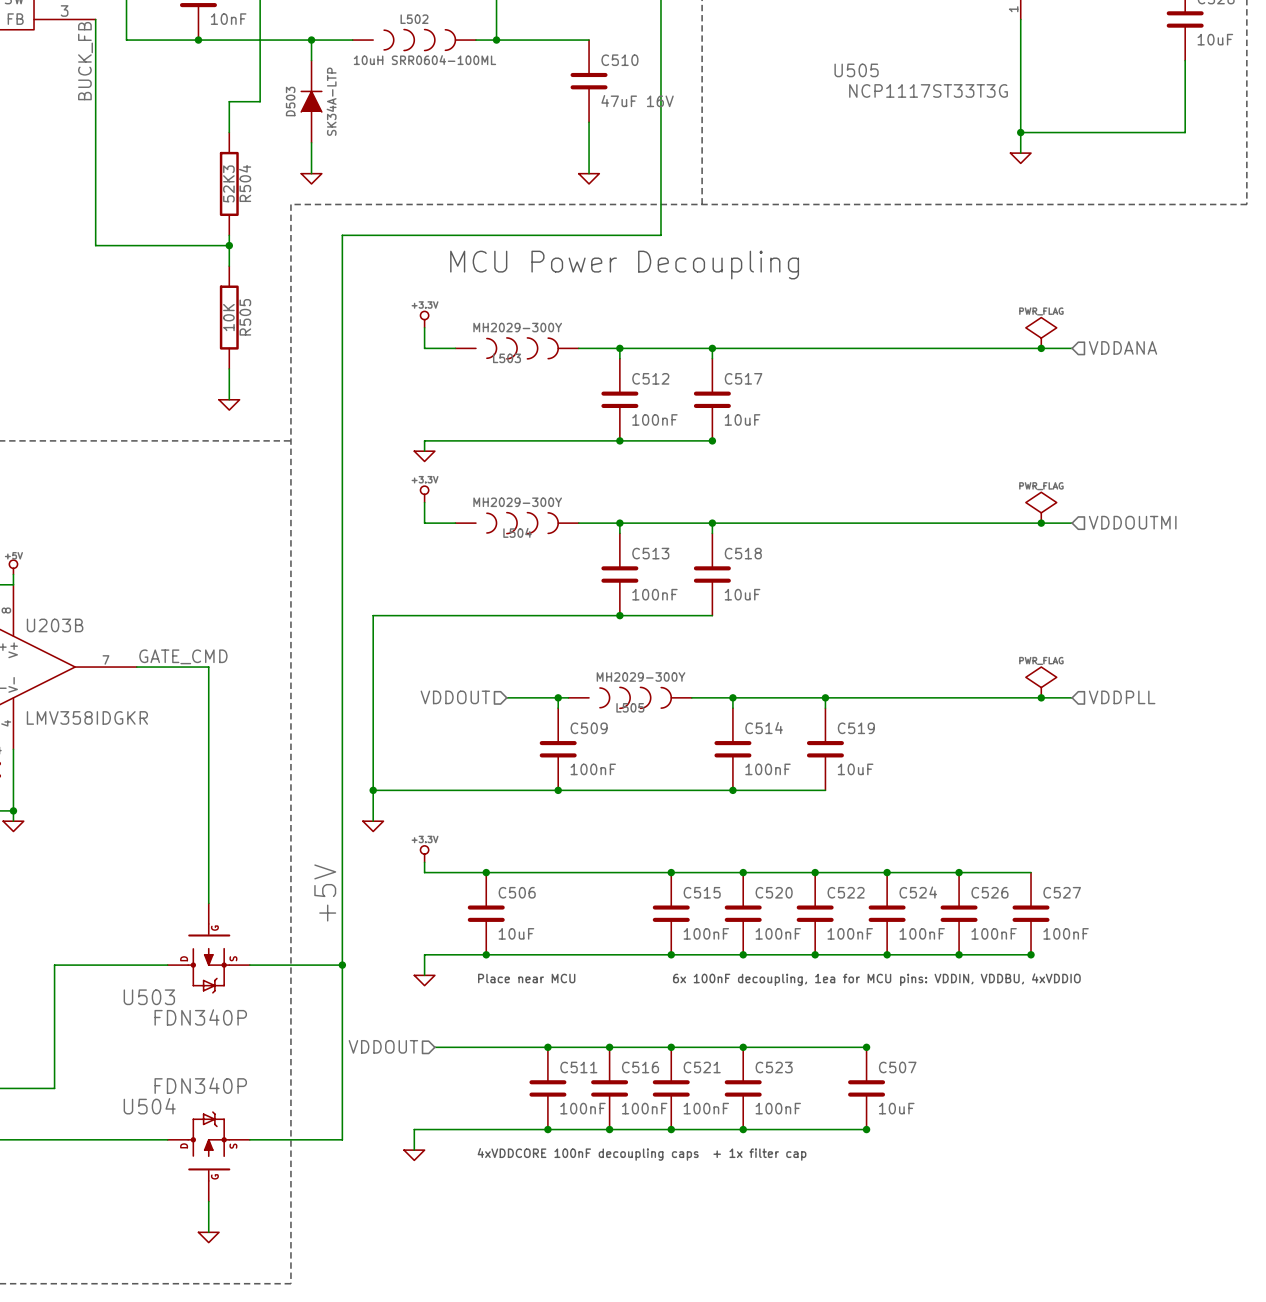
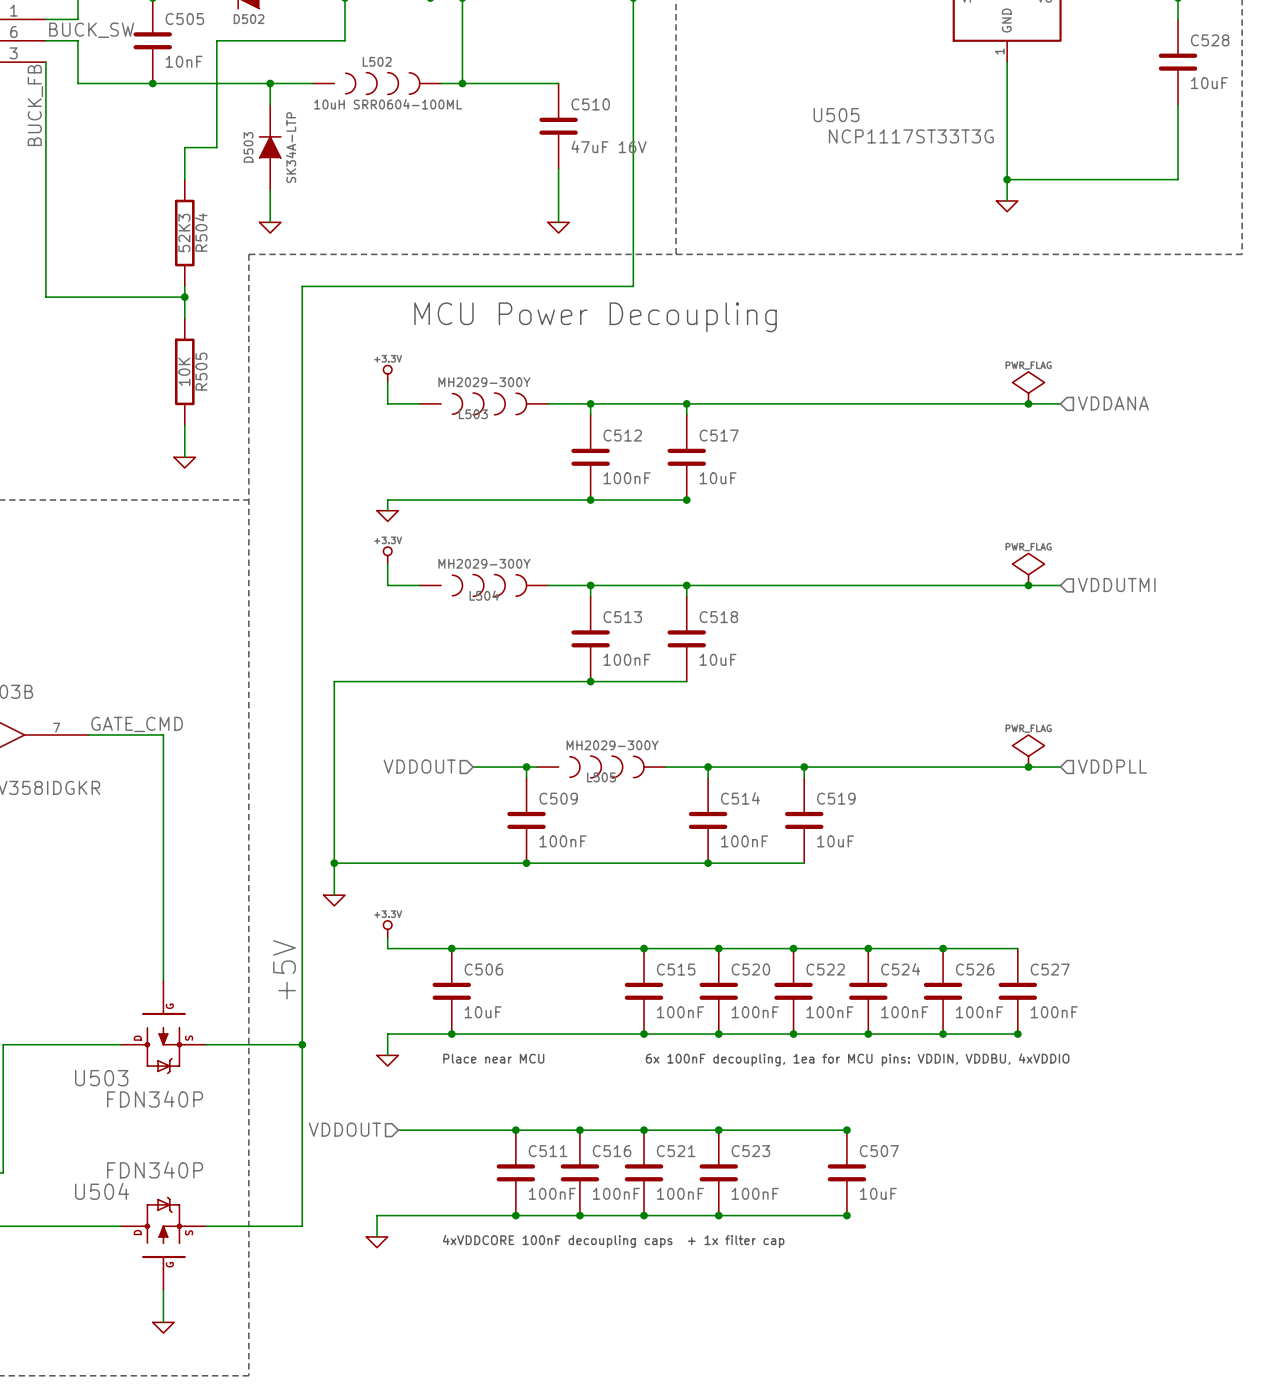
hierarchical label: VDDOUTMI (1132, 522) -> VDDUTMI (1116, 584)

